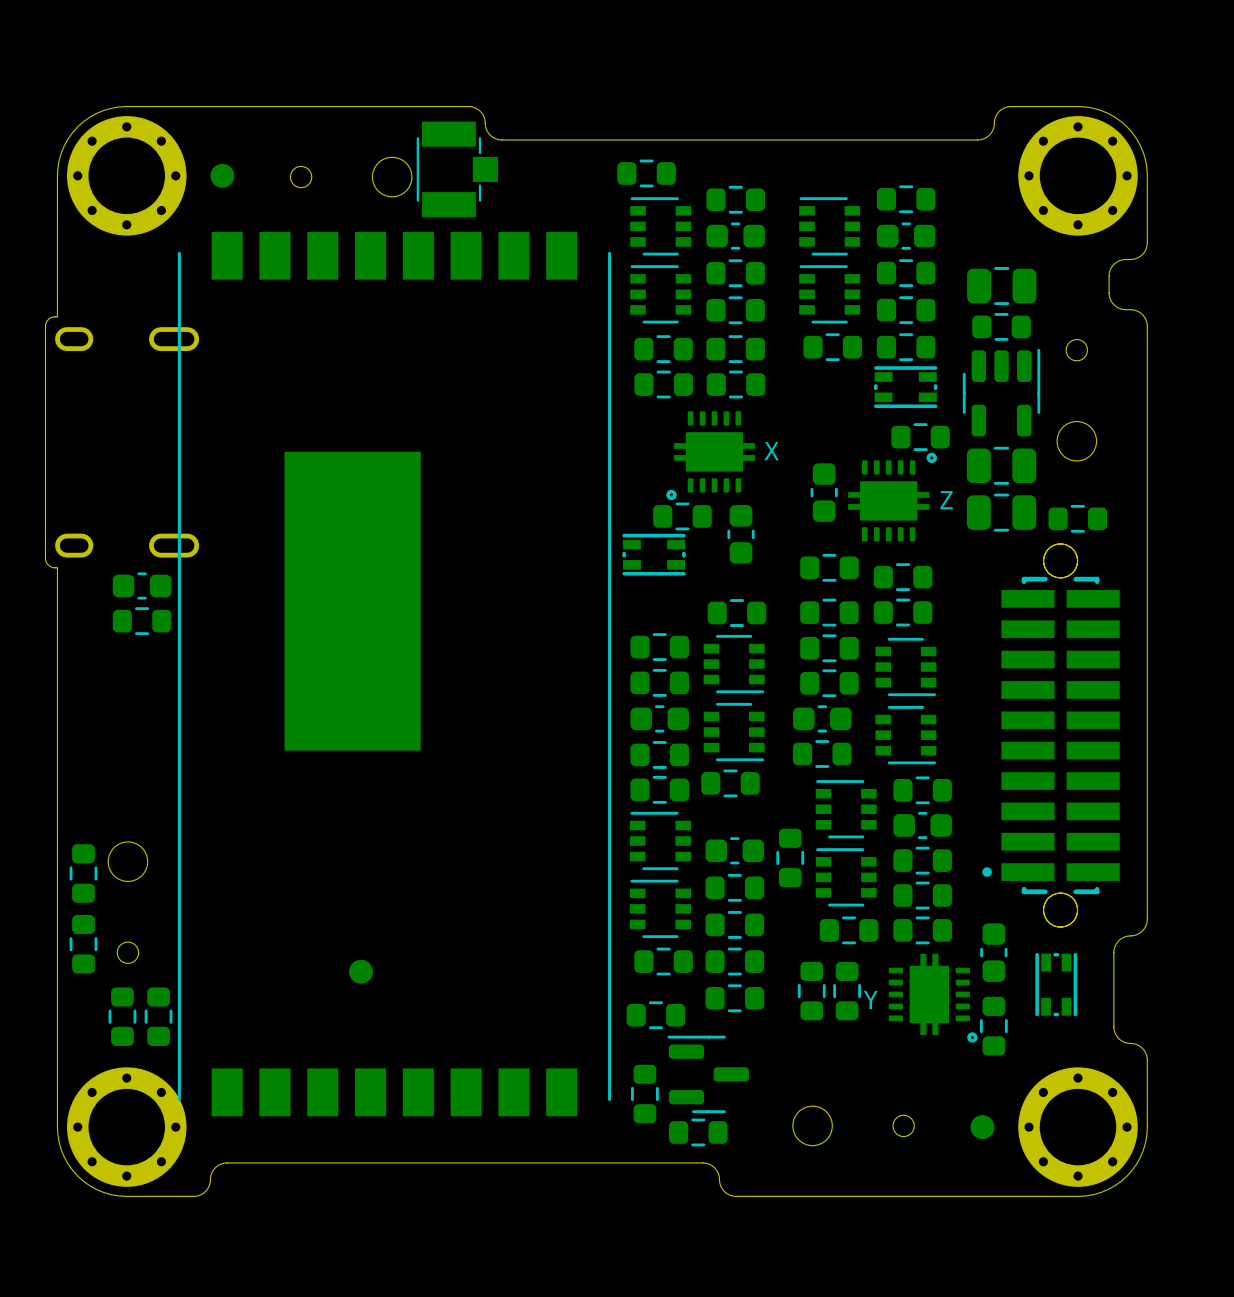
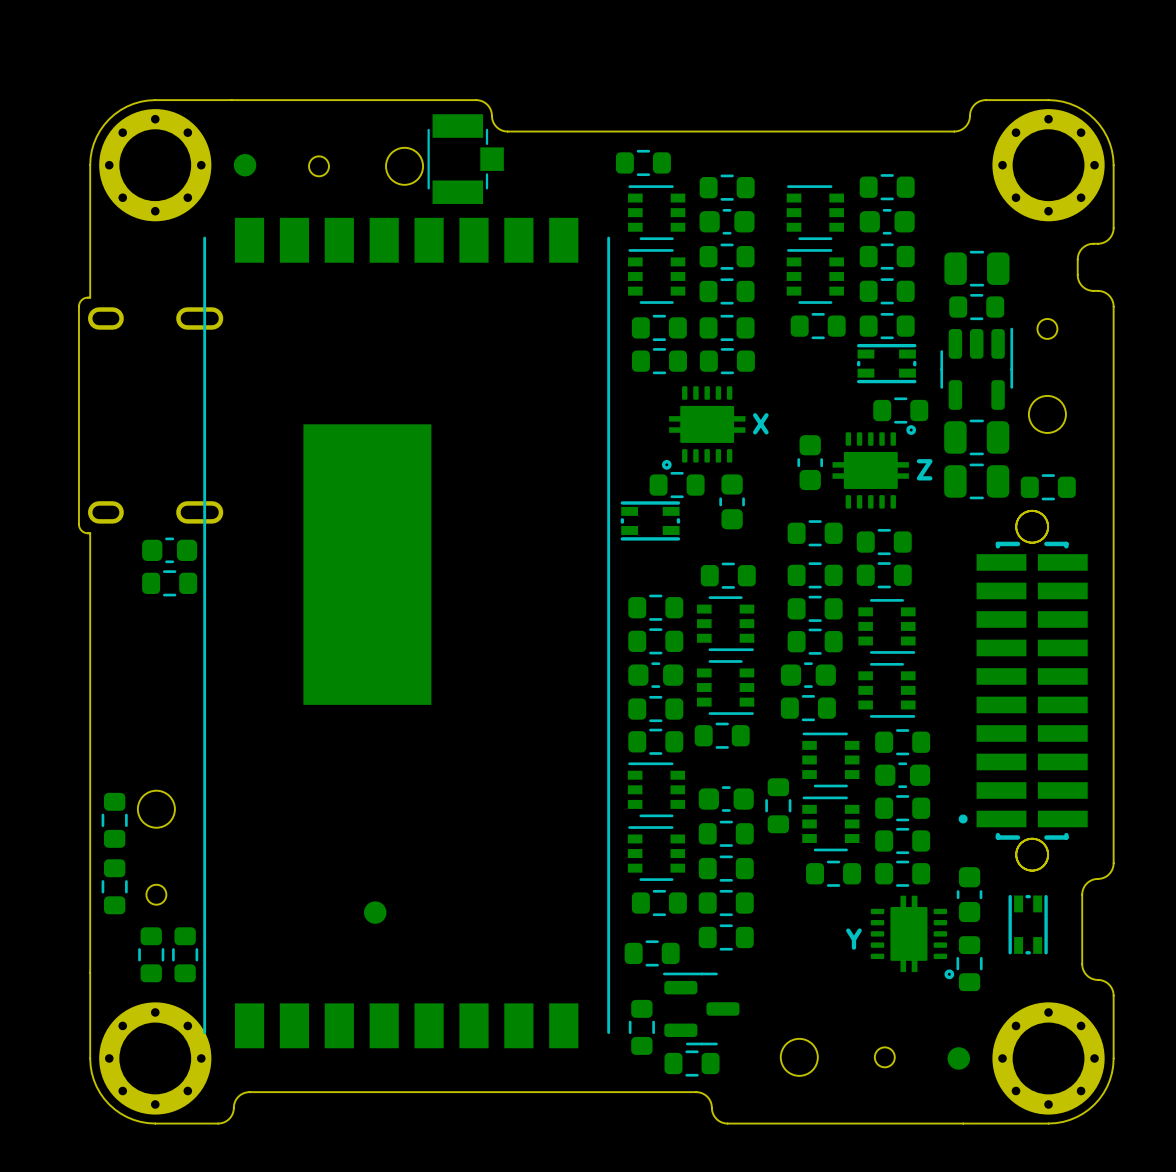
part: (811, 991) -> none
part: (847, 991) -> none

